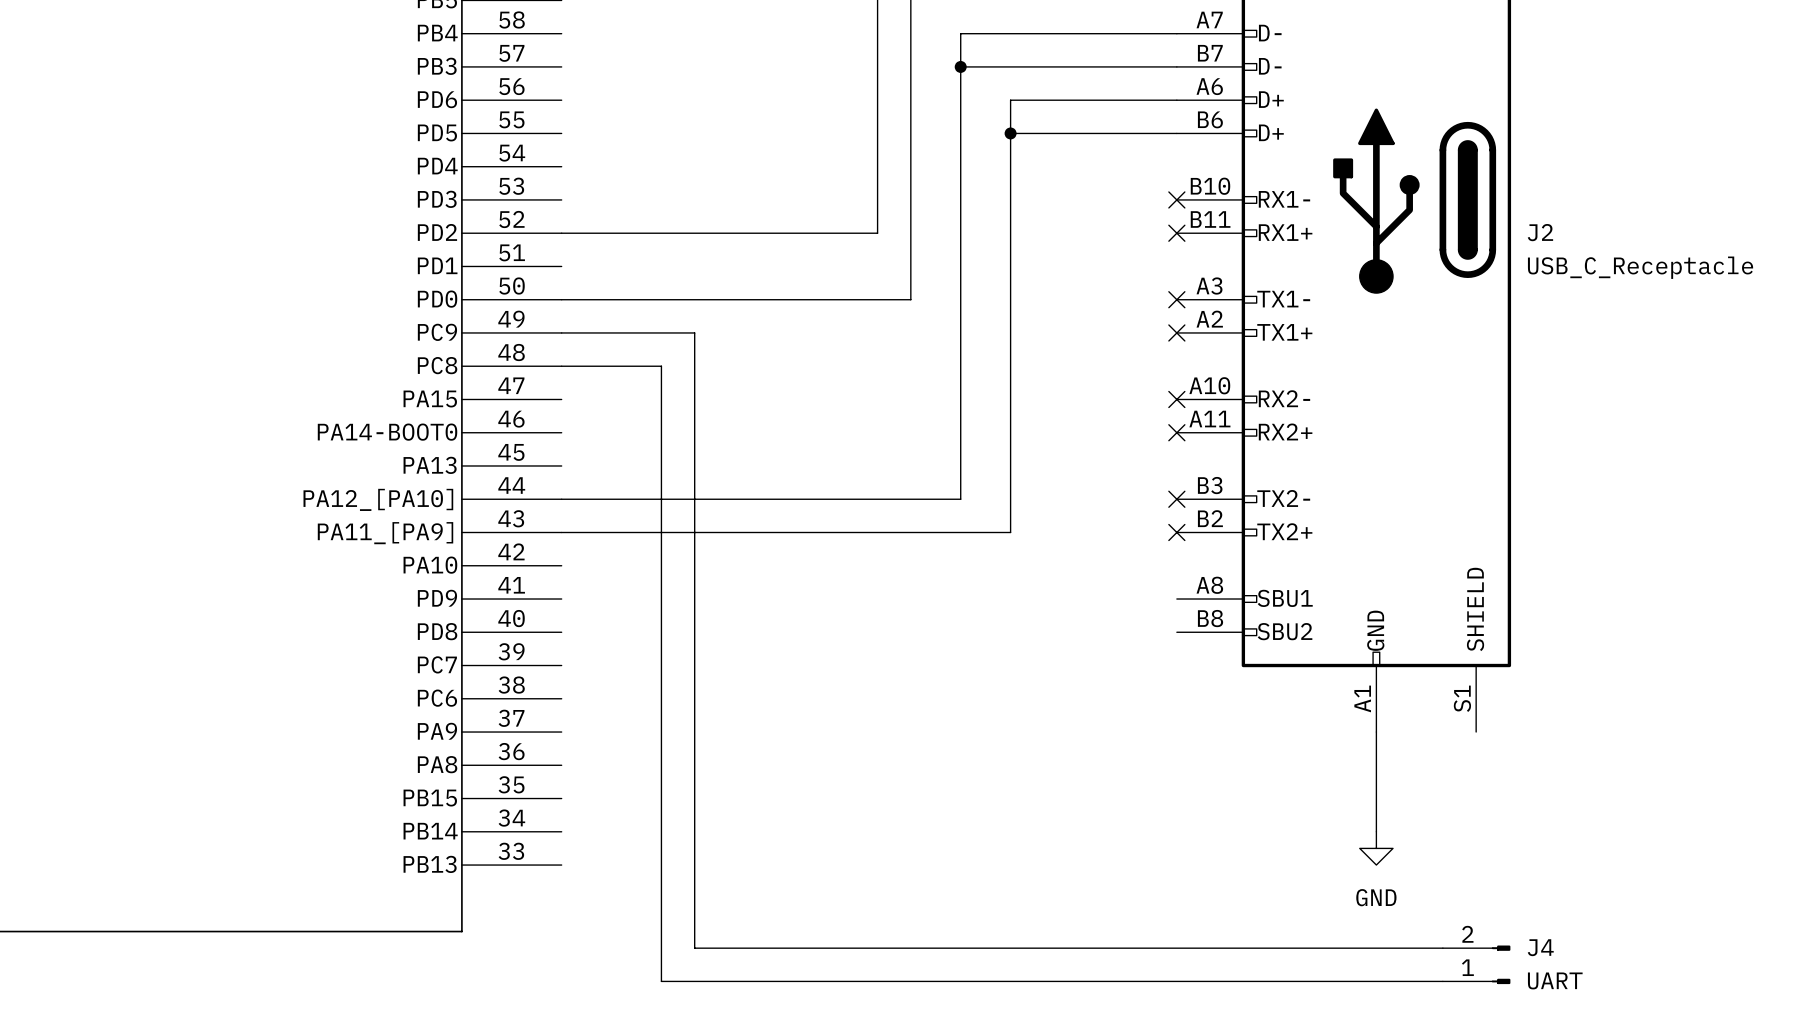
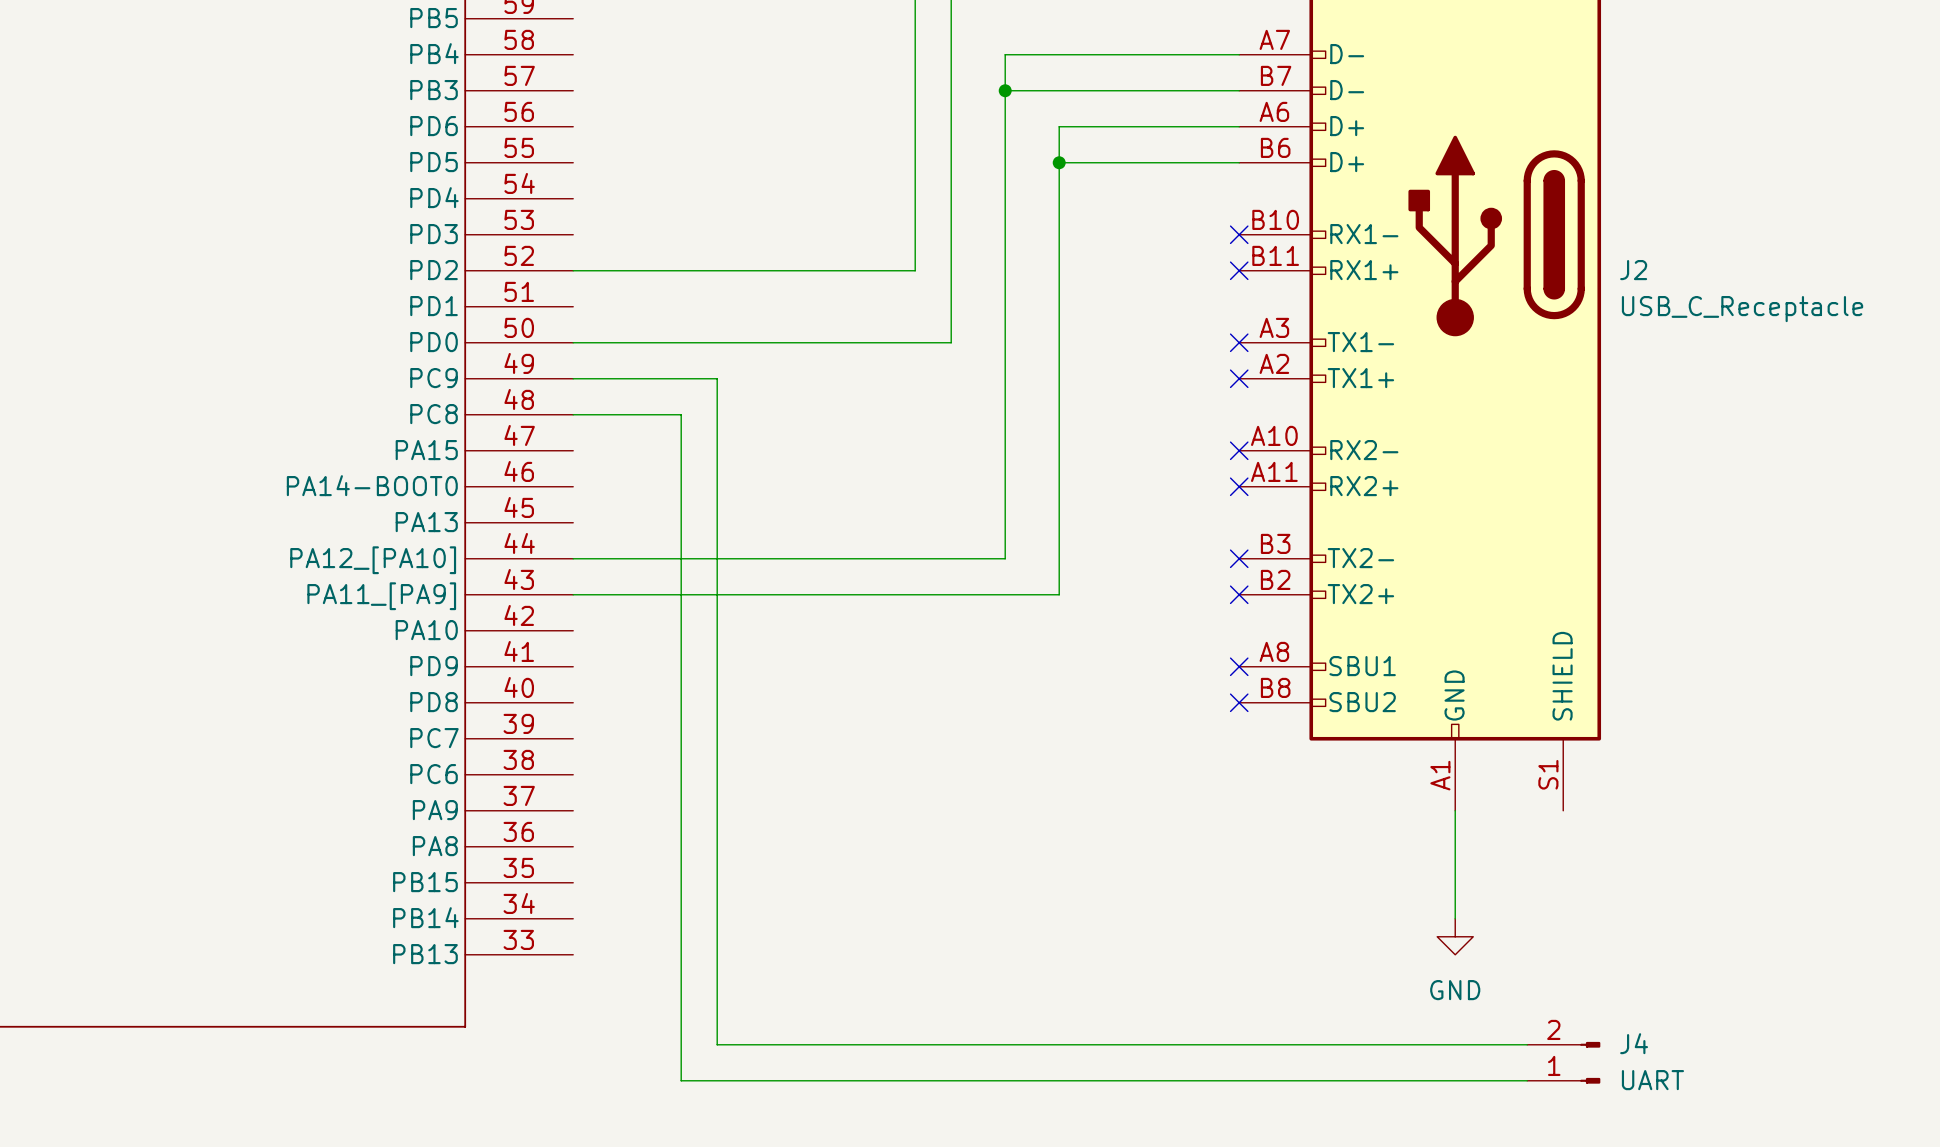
no-connect mark: none -> (1239, 666)
no-connect mark: none -> (1239, 702)

